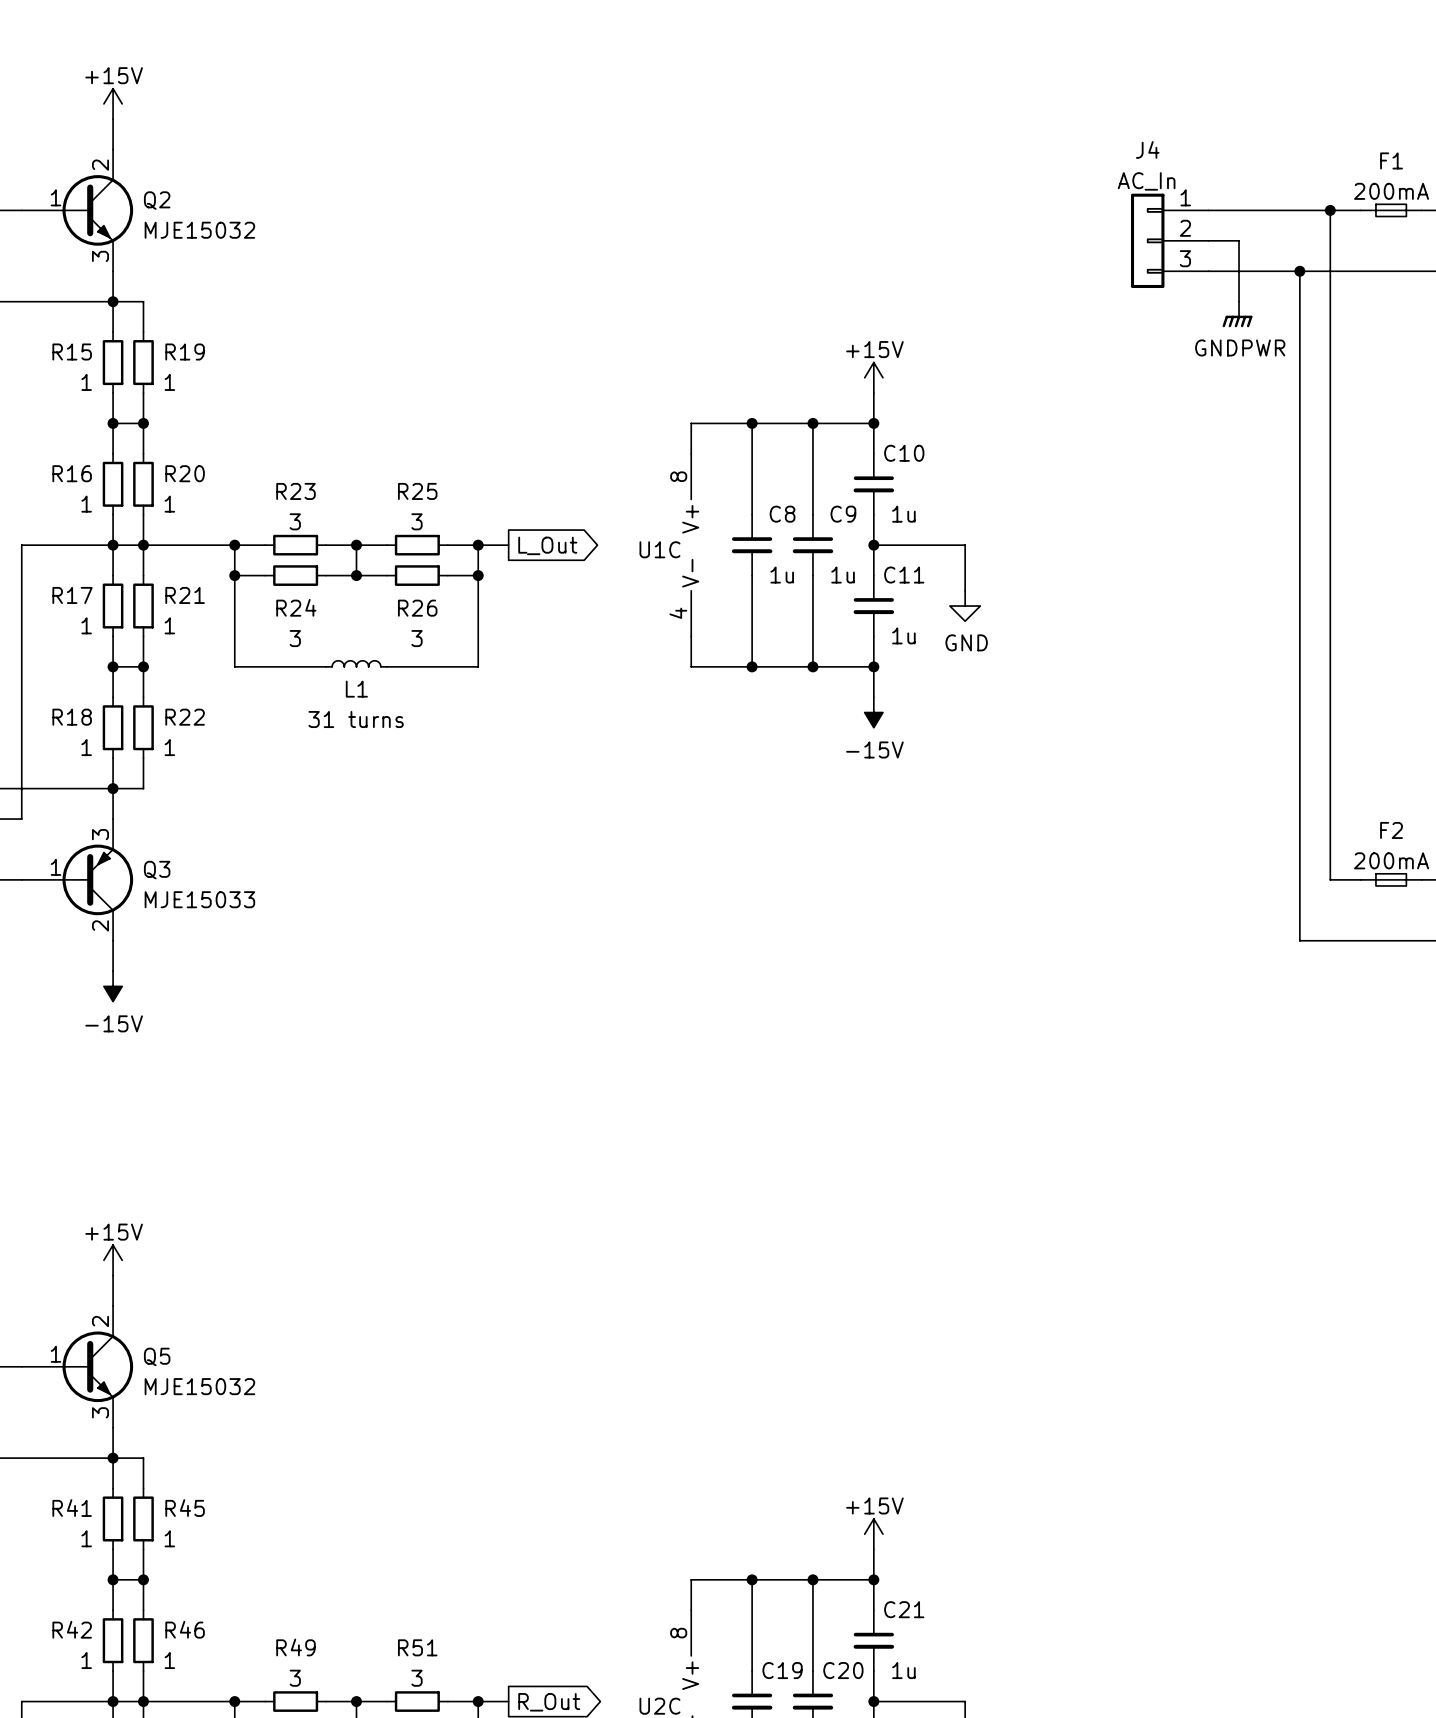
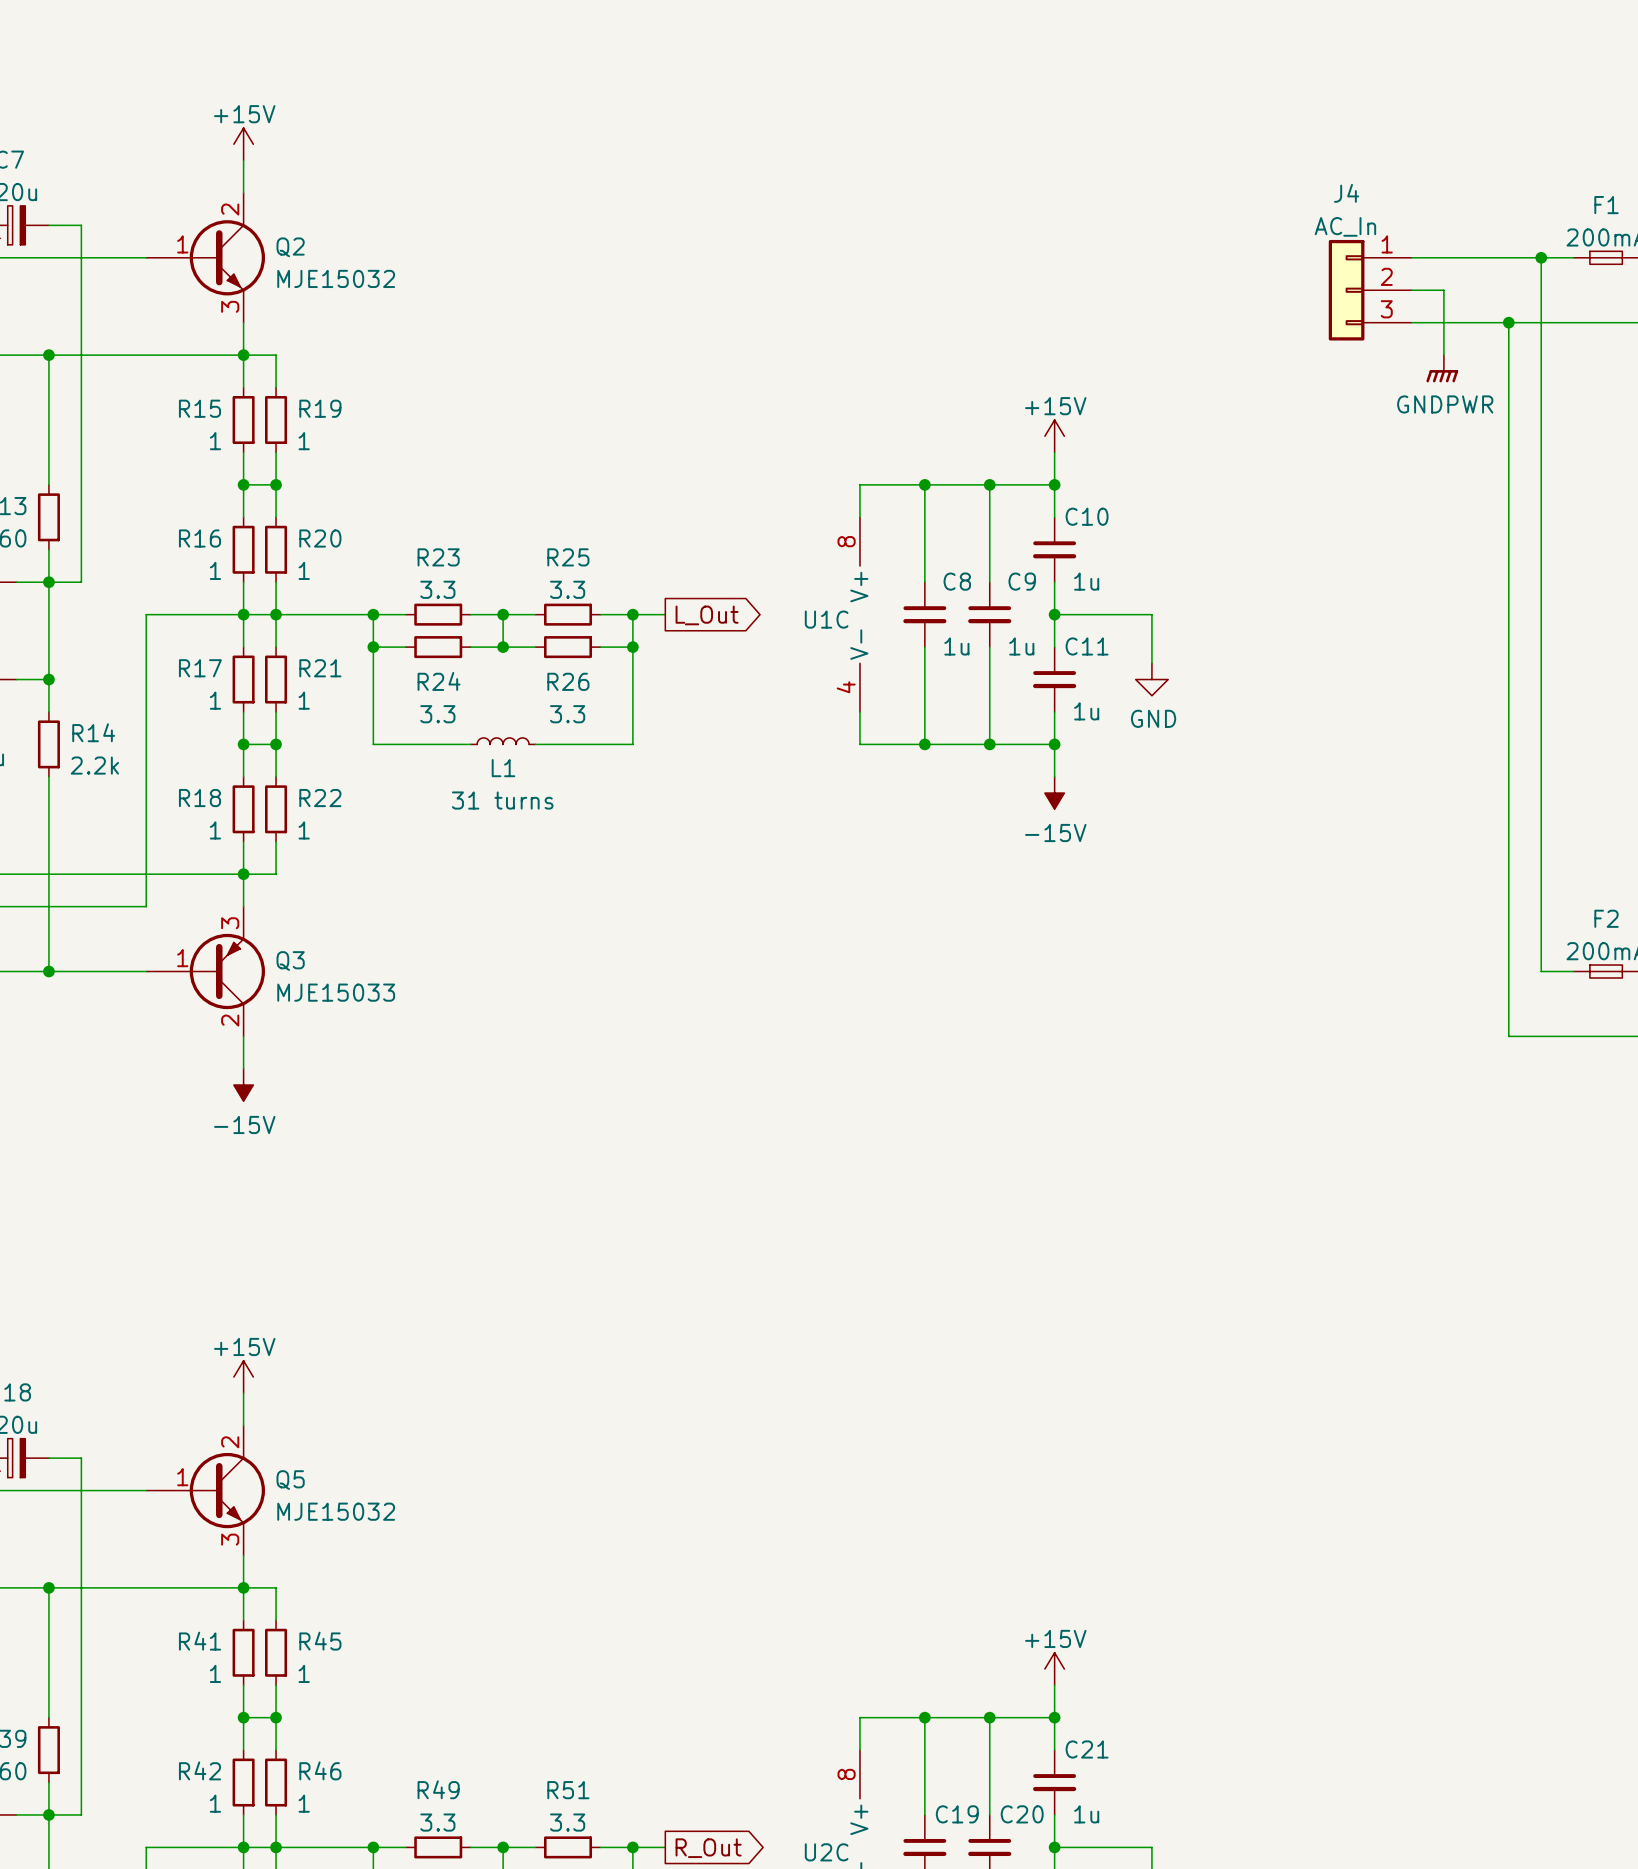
R23 value: 3 (295, 521) -> 3.3 (437, 589)
R25 value: 3 (417, 521) -> 3.3 (567, 589)
R24 value: 3 (295, 638) -> 3.3 (437, 714)
R26 value: 3 (417, 638) -> 3.3 (567, 714)
R49 value: 3 (295, 1678) -> 3.3 (437, 1822)
R51 value: 3 (417, 1678) -> 3.3 (567, 1822)

